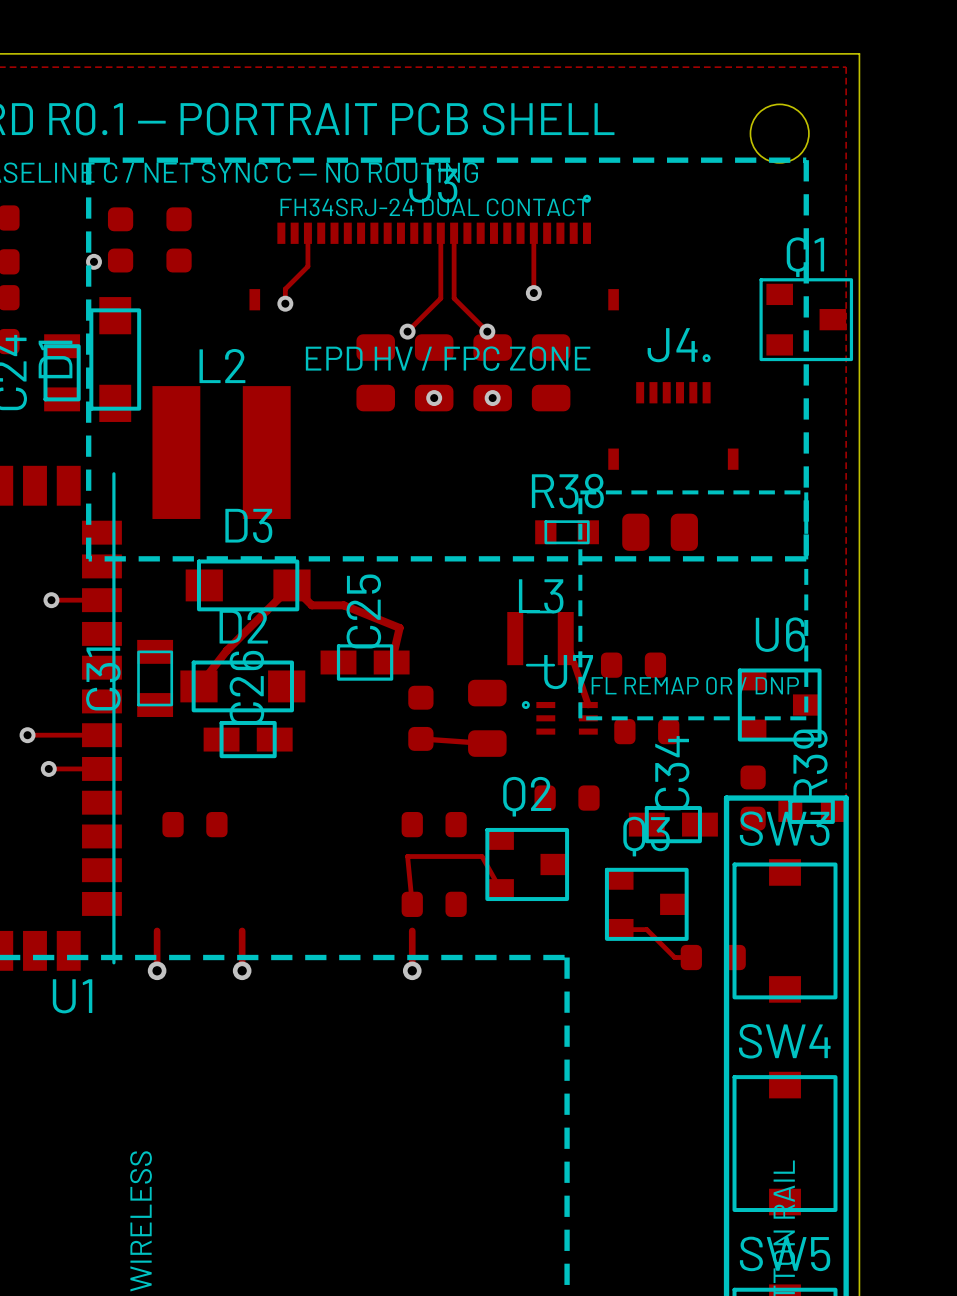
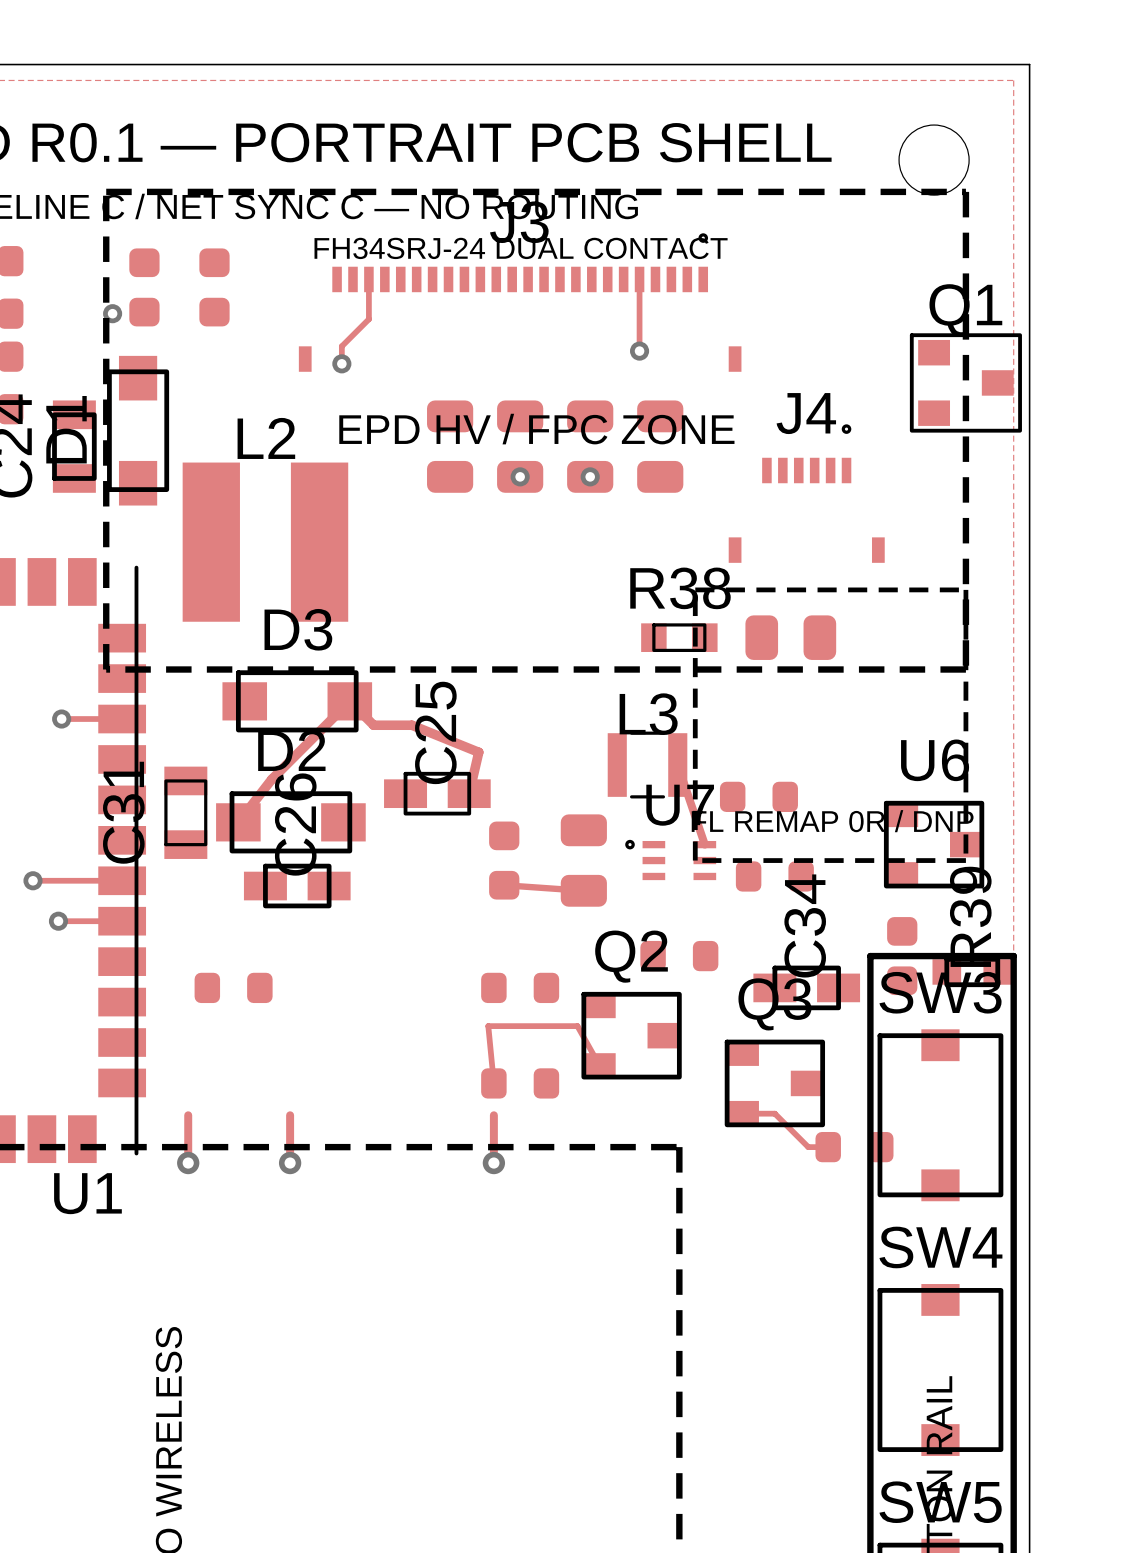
track: (440, 233) (440, 298) (407, 331) -> none
track: (454, 233) (454, 298) (487, 331) -> none
via: (407, 331) -> none
via: (487, 331) -> none

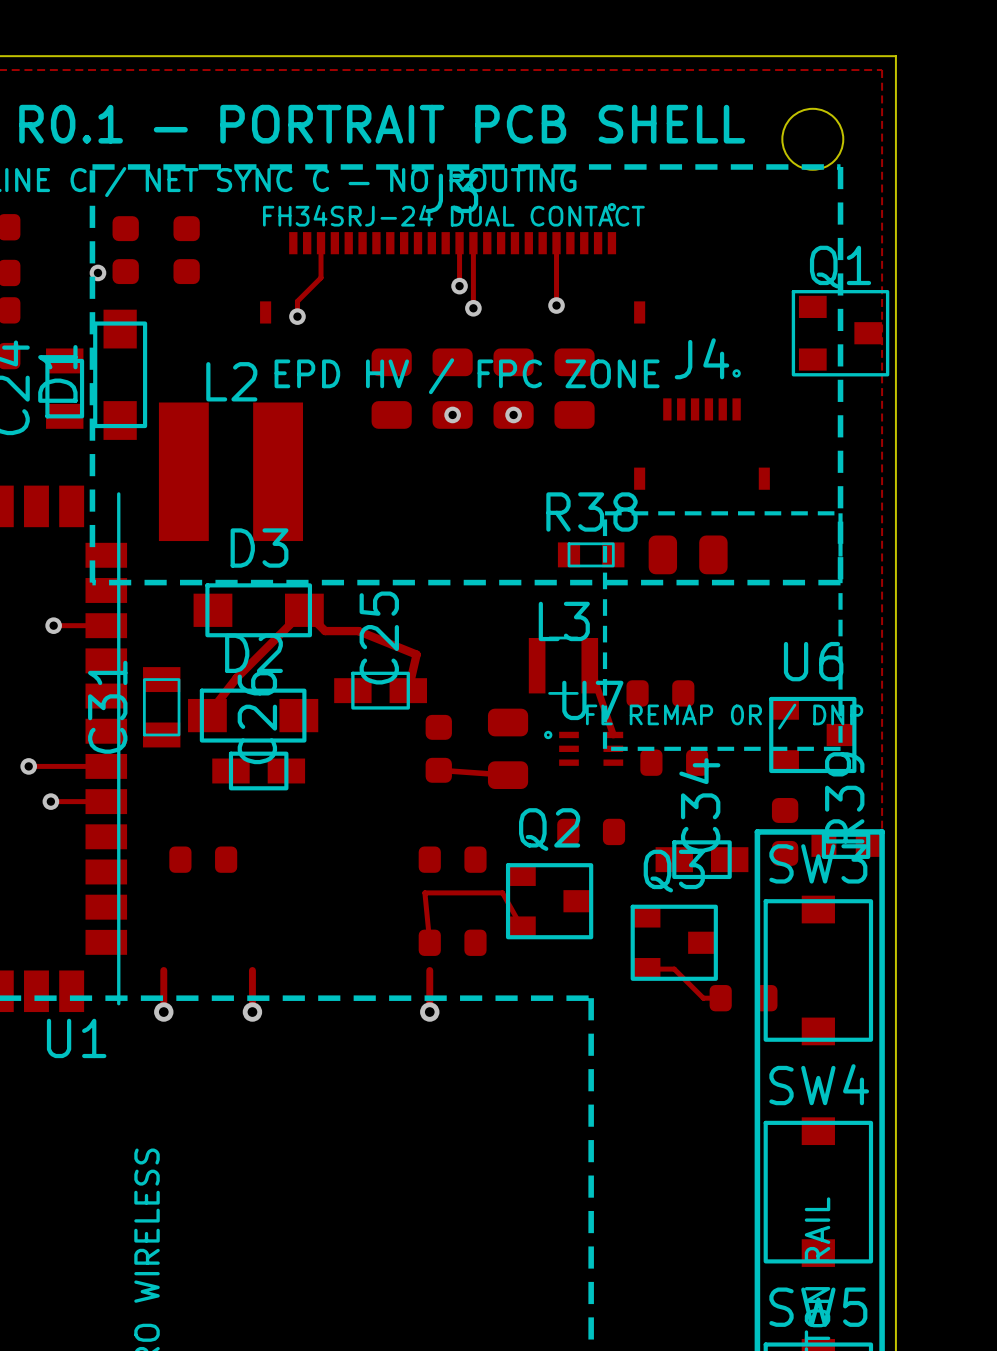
track: none -> (459, 243) (459, 286)
track: none -> (473, 243) (473, 308)
via: none -> (459, 286)
via: none -> (473, 308)

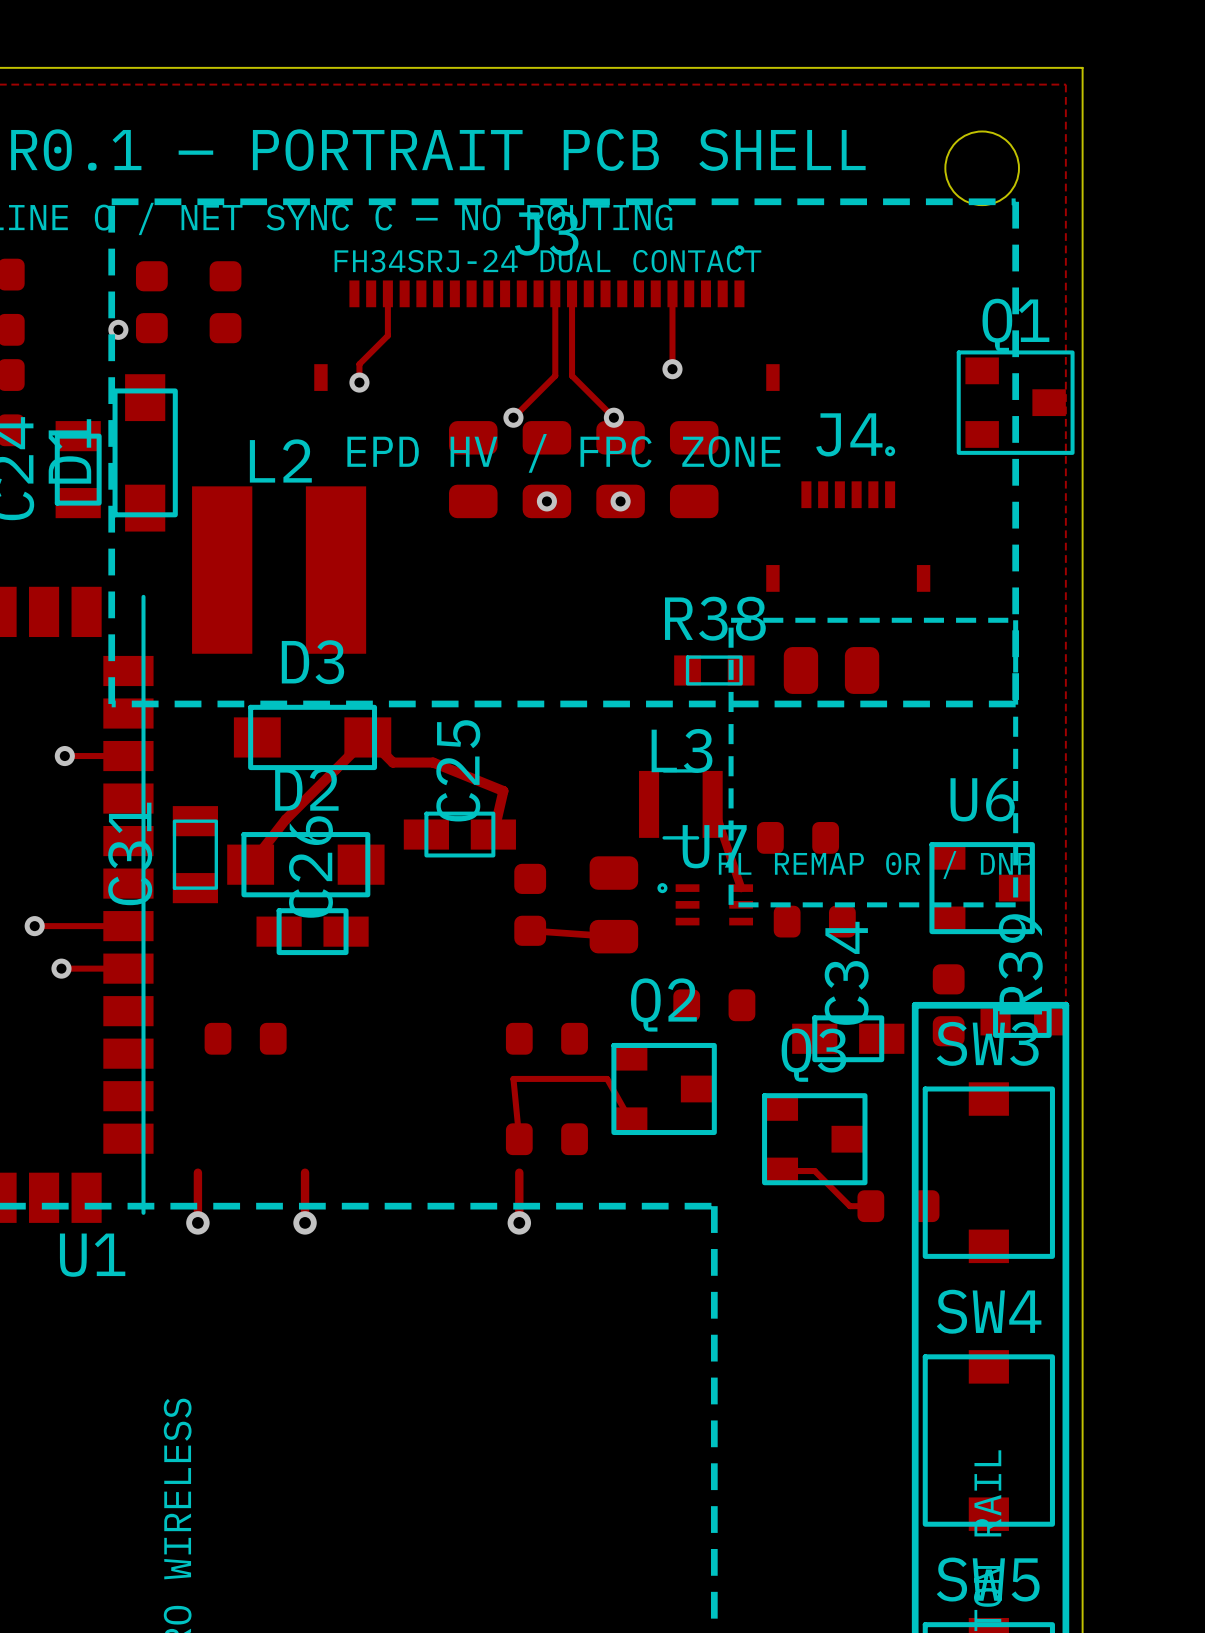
track: none -> (555, 345) (555, 375) (513, 417)
via: (459, 286) -> none
track: none -> (572, 372) (572, 375) (613, 417)
via: (473, 308) -> none
via: none -> (513, 417)
via: none -> (613, 417)

